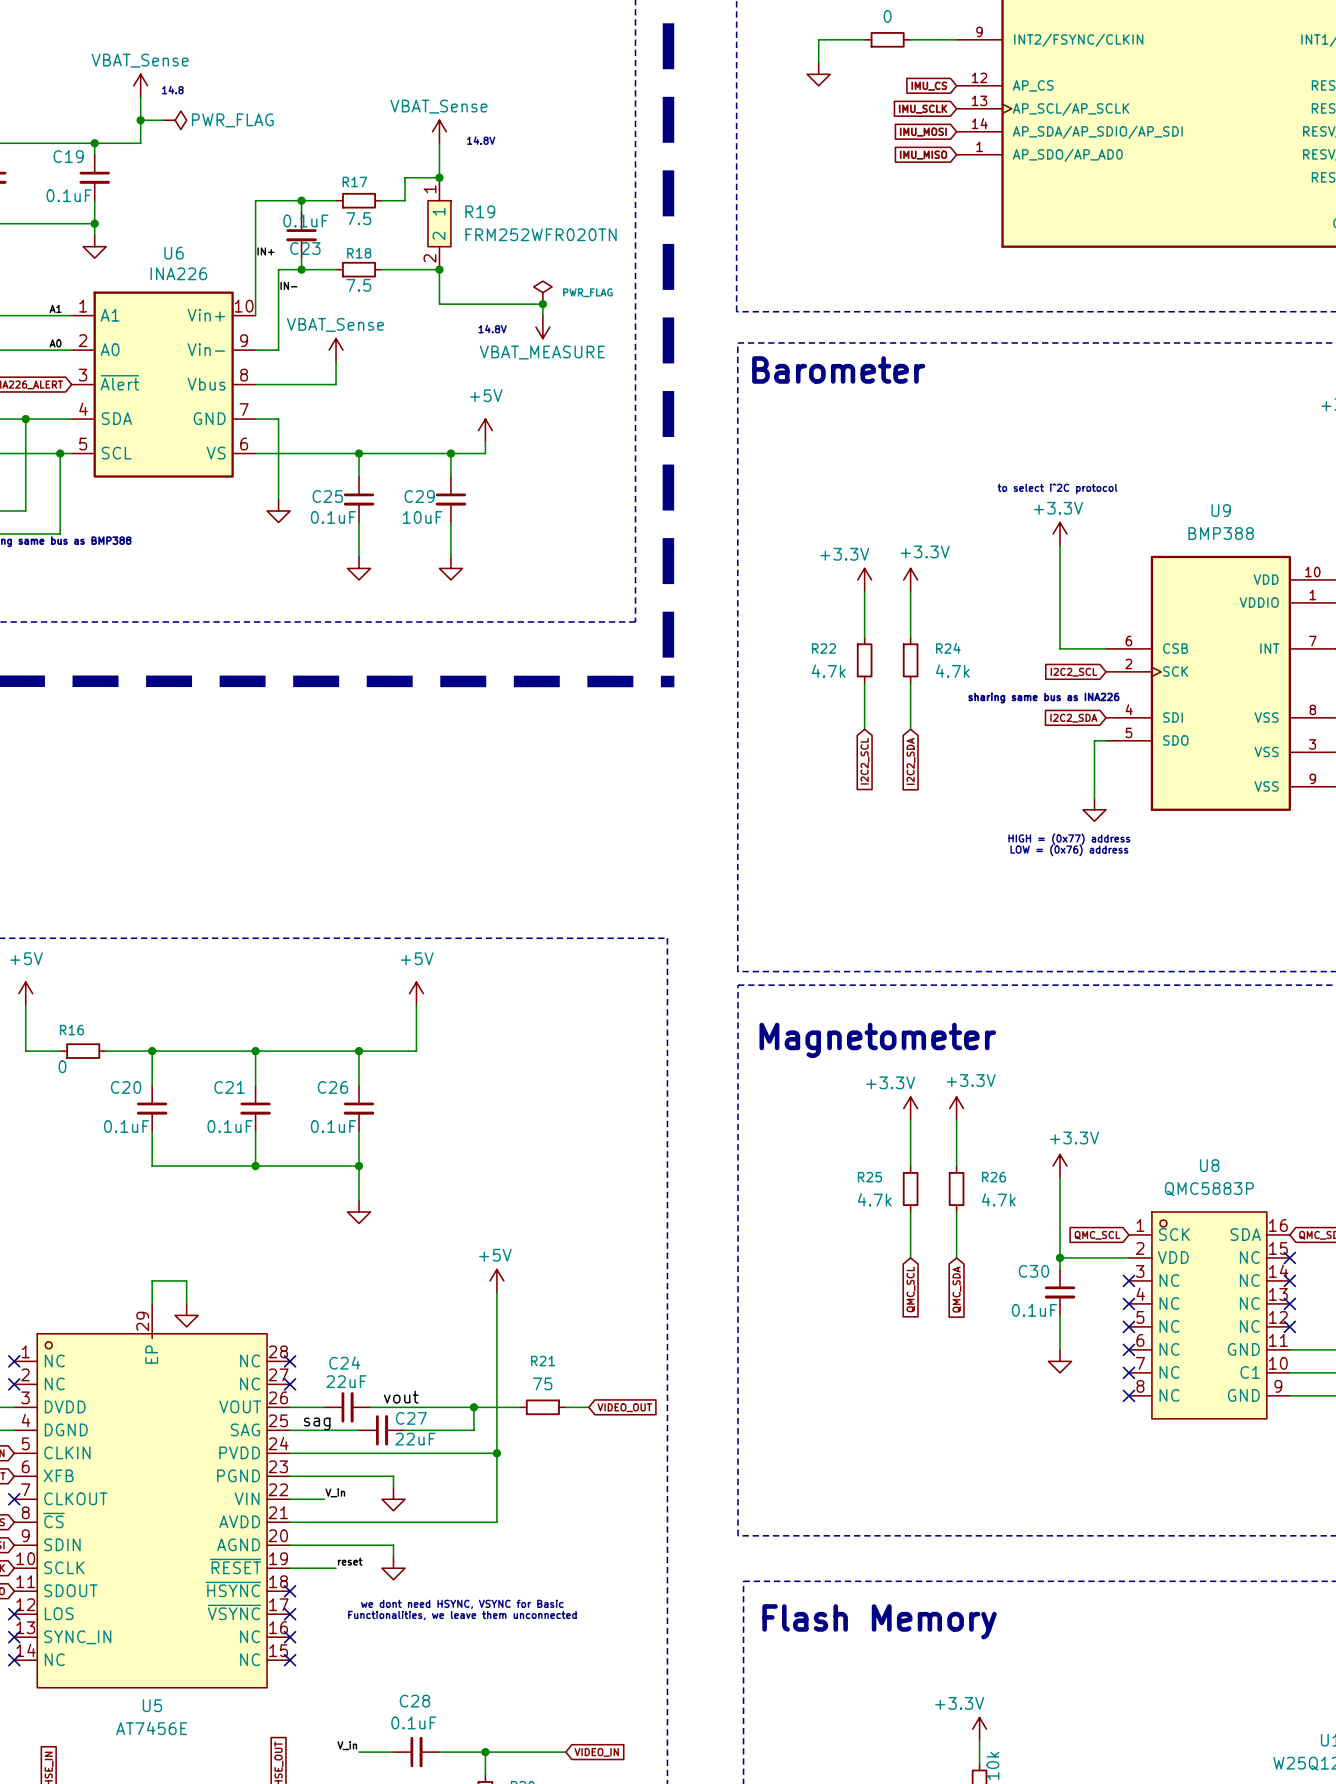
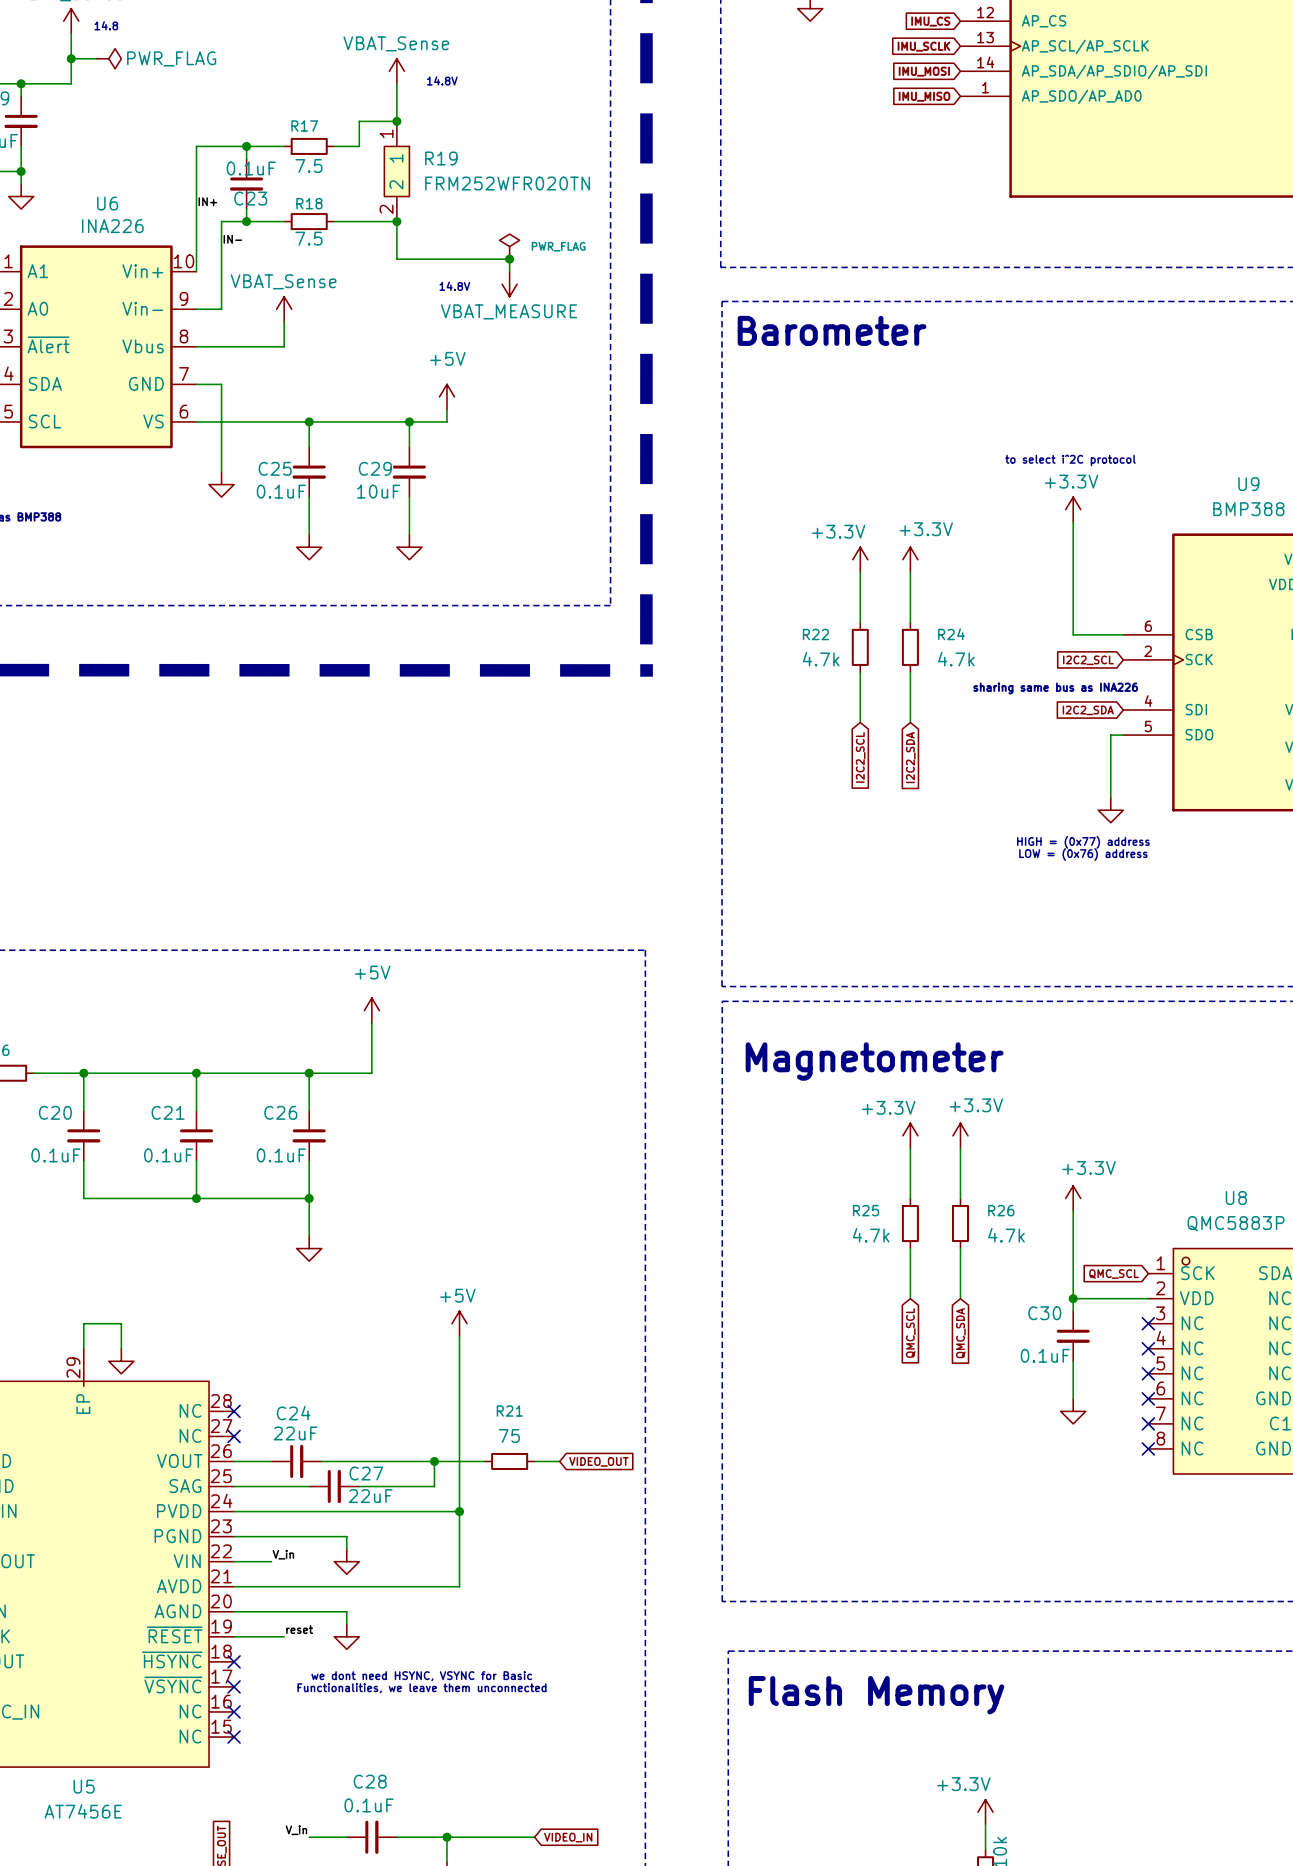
label: vout (401, 1397) -> none
label: sag (317, 1423) -> none

